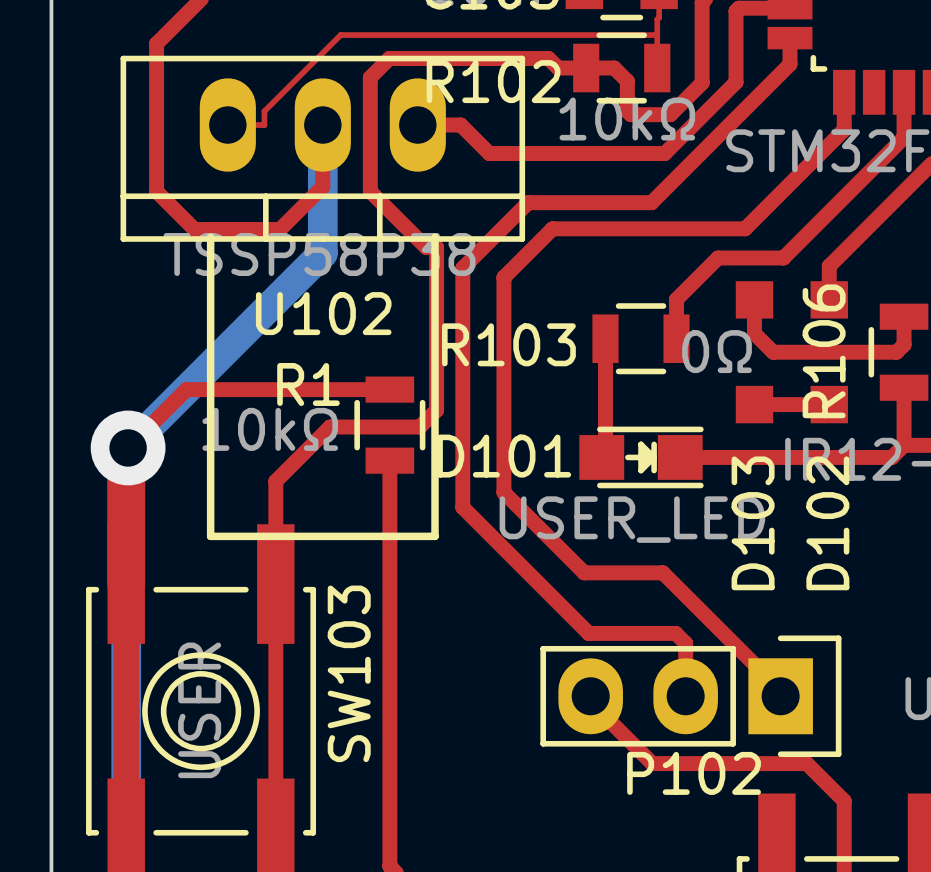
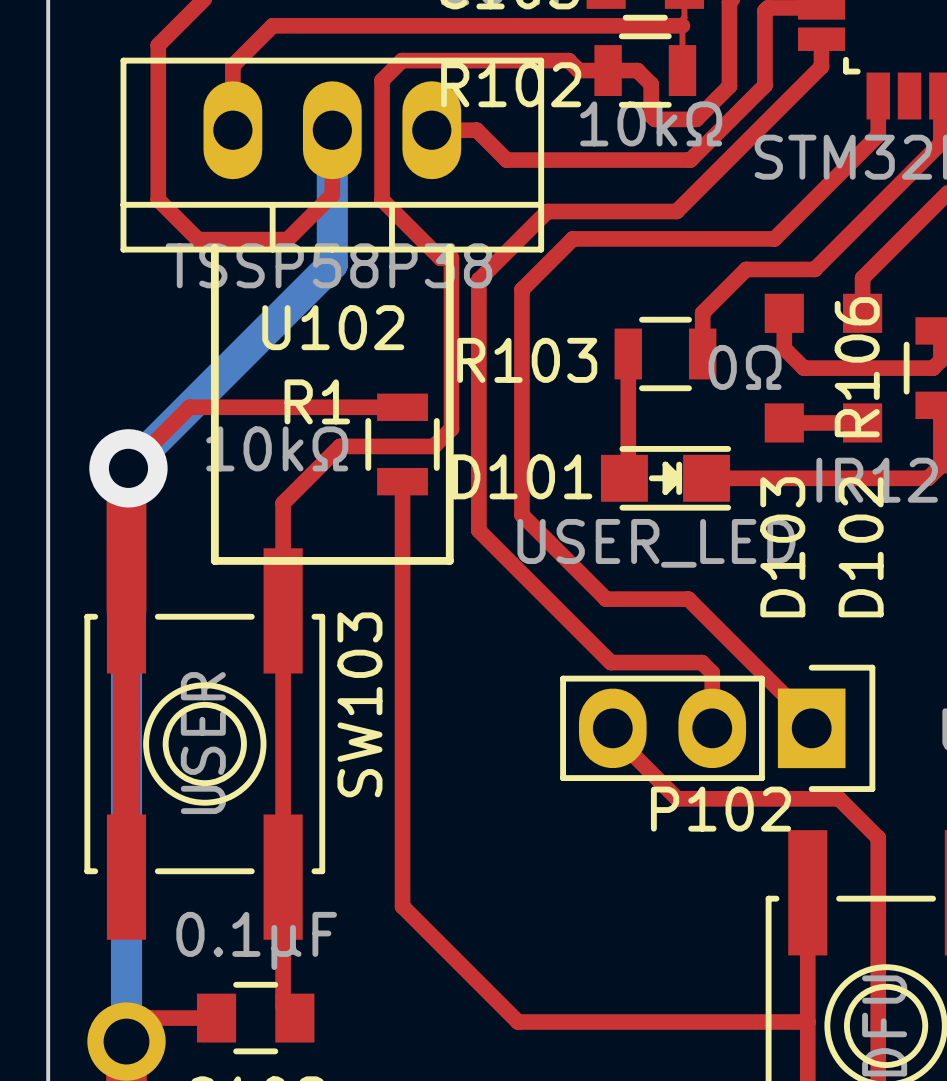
top track: (657, 35) (340, 35) (264, 111) (264, 125) (227, 125) -> (682, 25) (272, 25) (232, 65) (232, 130)

